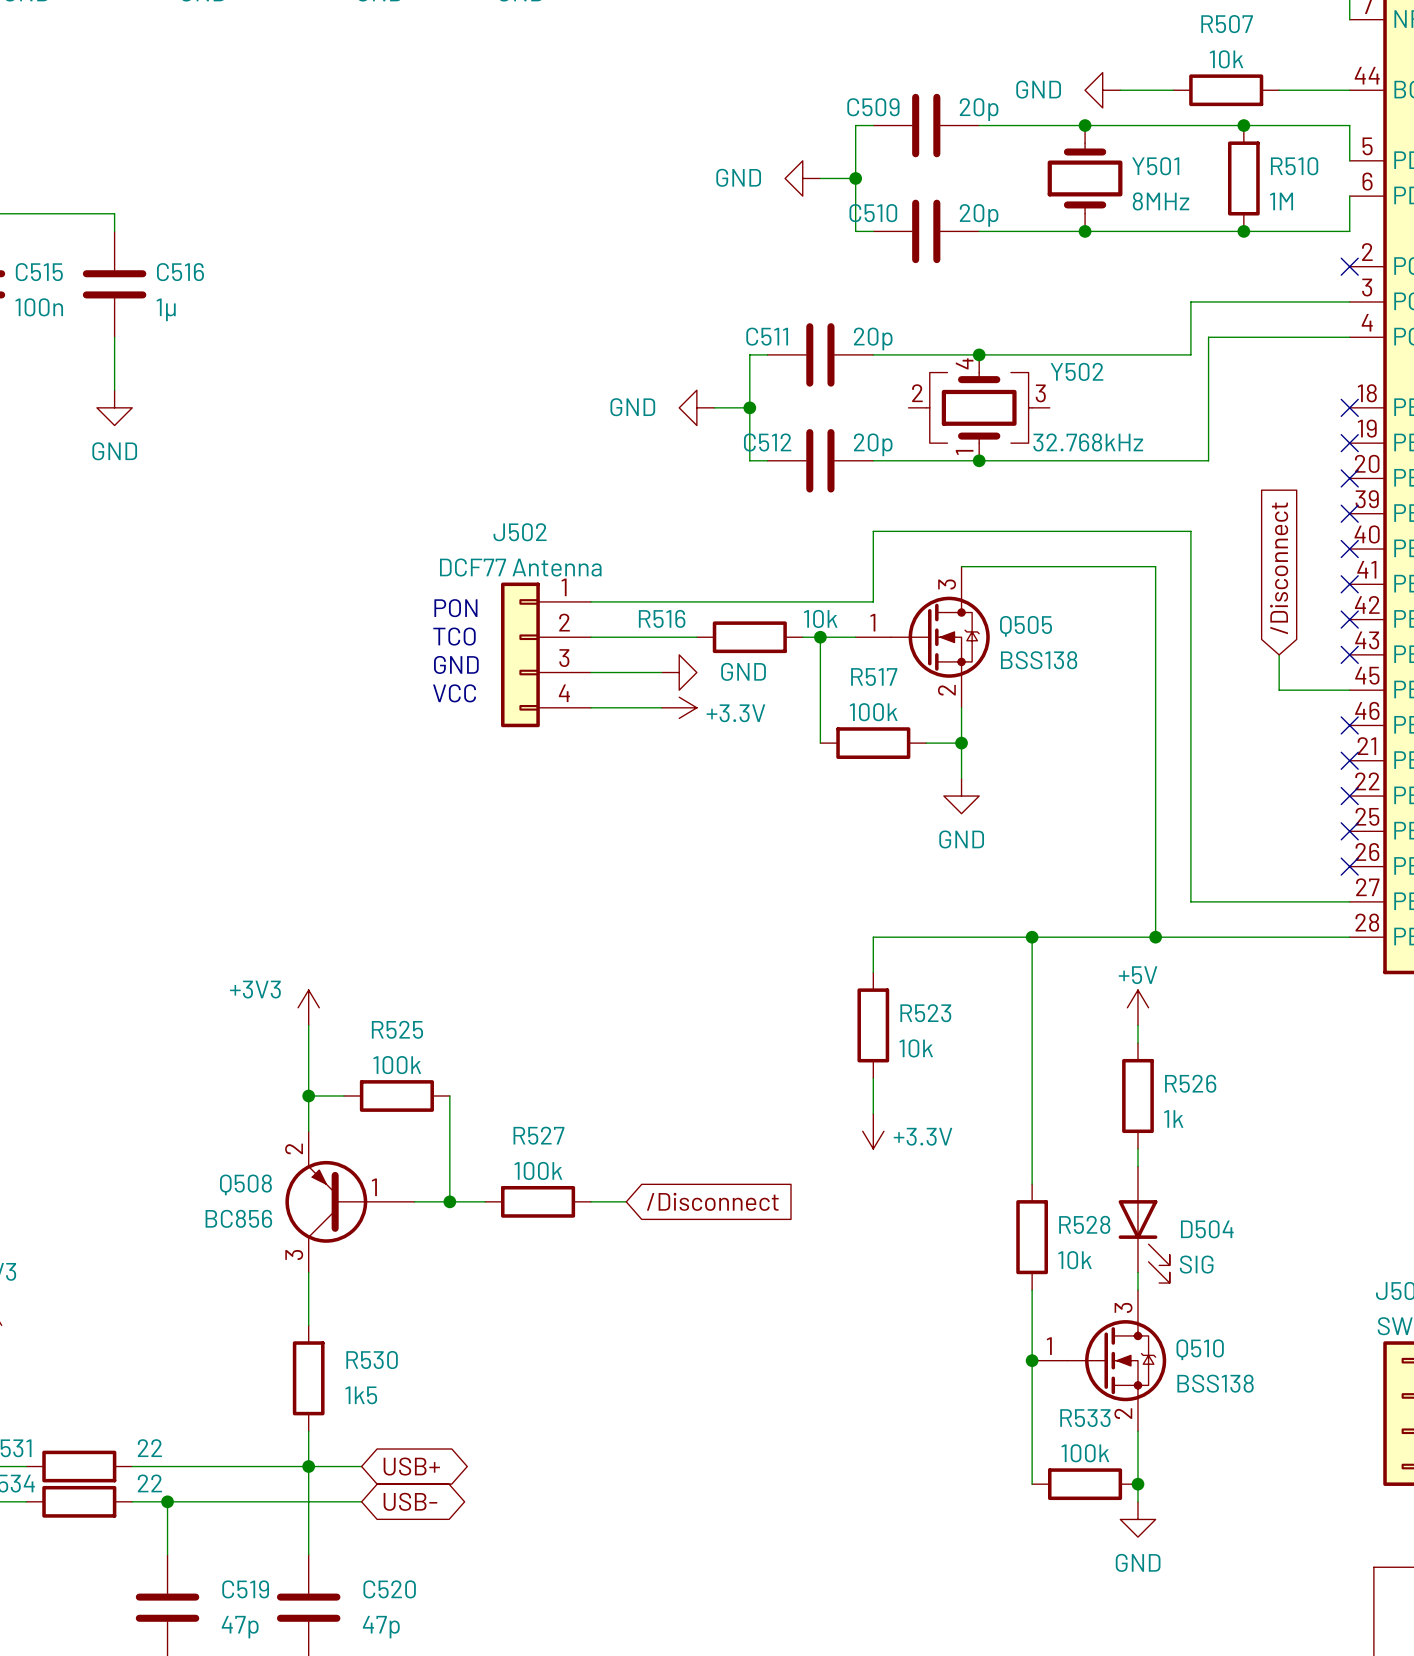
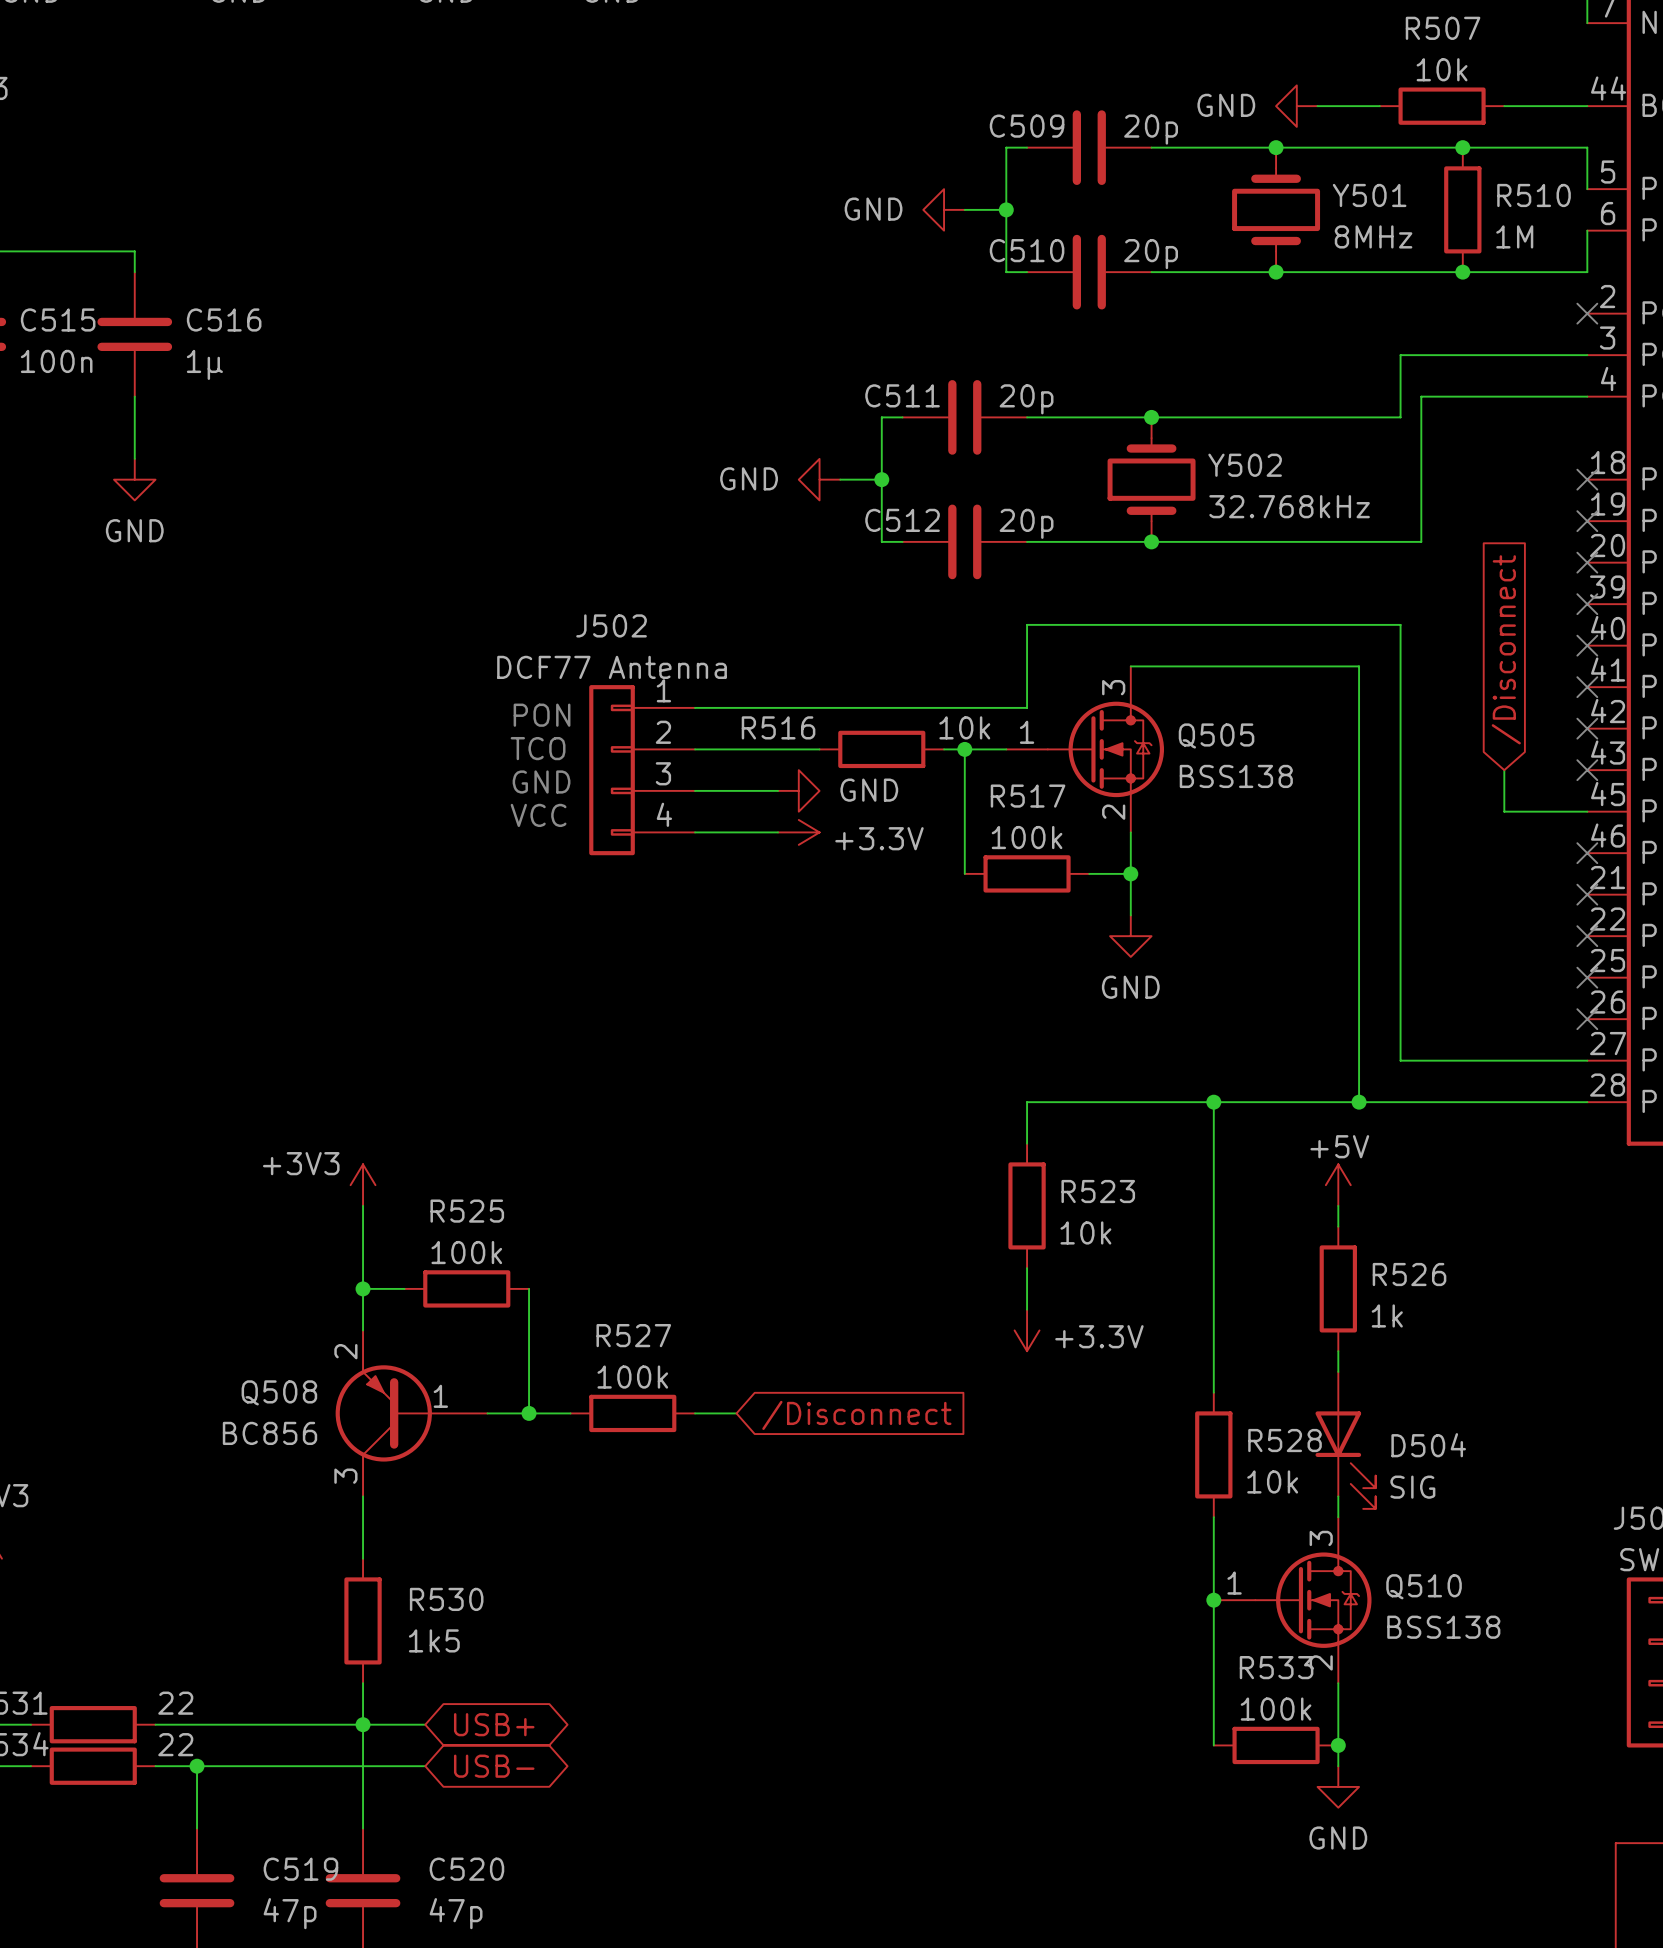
Y502 symbol: [908, 354, 1050, 461] -> [1107, 417, 1196, 542]
Y502 name position: Y502 (1077, 371) -> Y502 (1245, 465)

